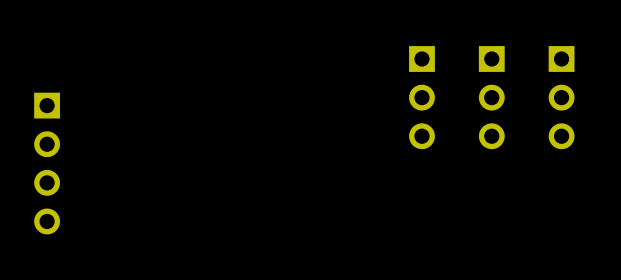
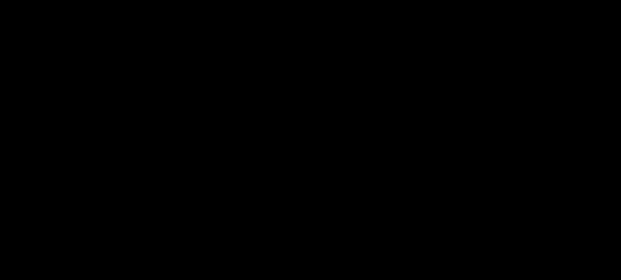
part: (421, 97) -> none
part: (491, 97) -> none
part: (561, 97) -> none
part: (47, 163) -> none

